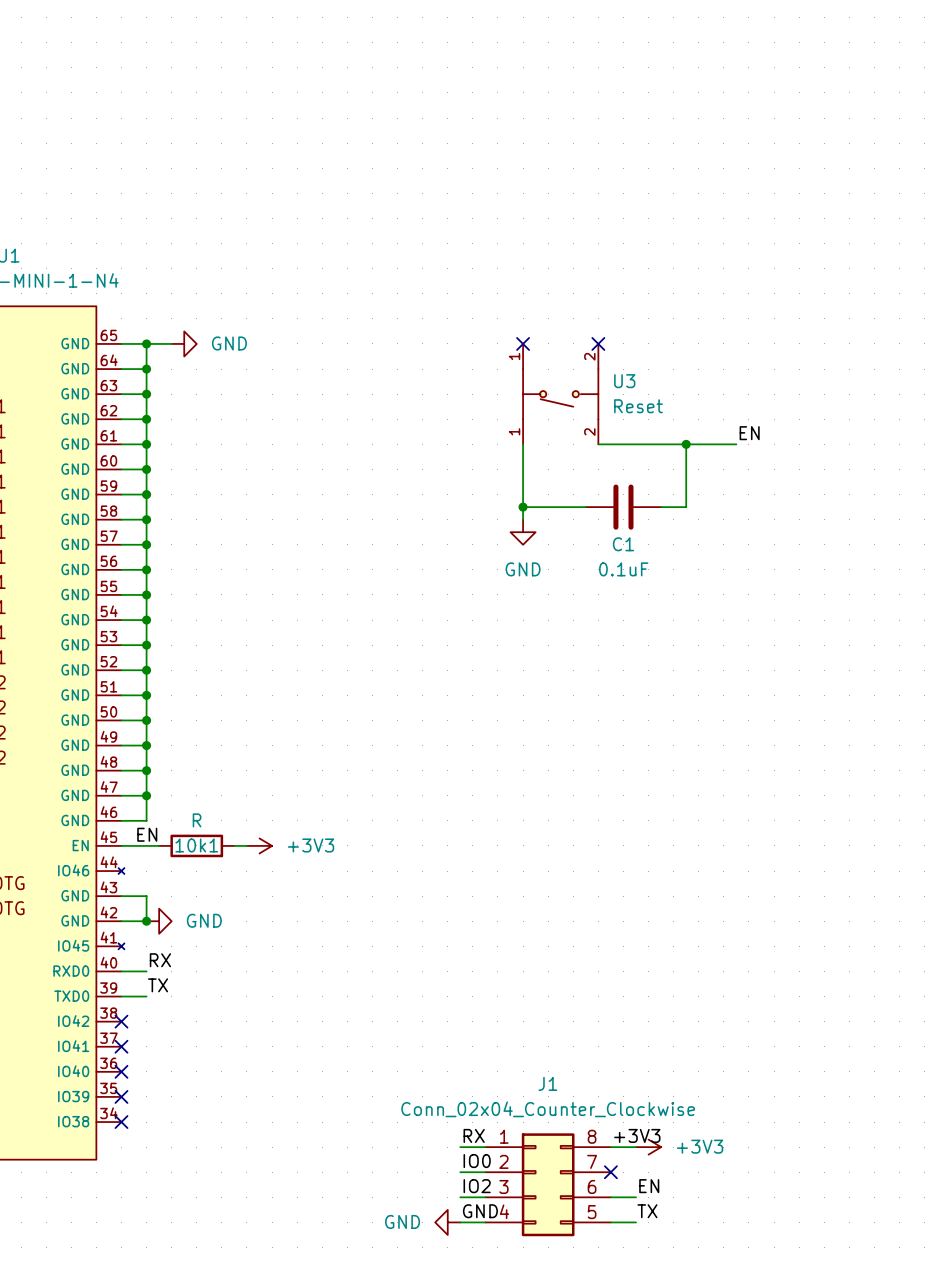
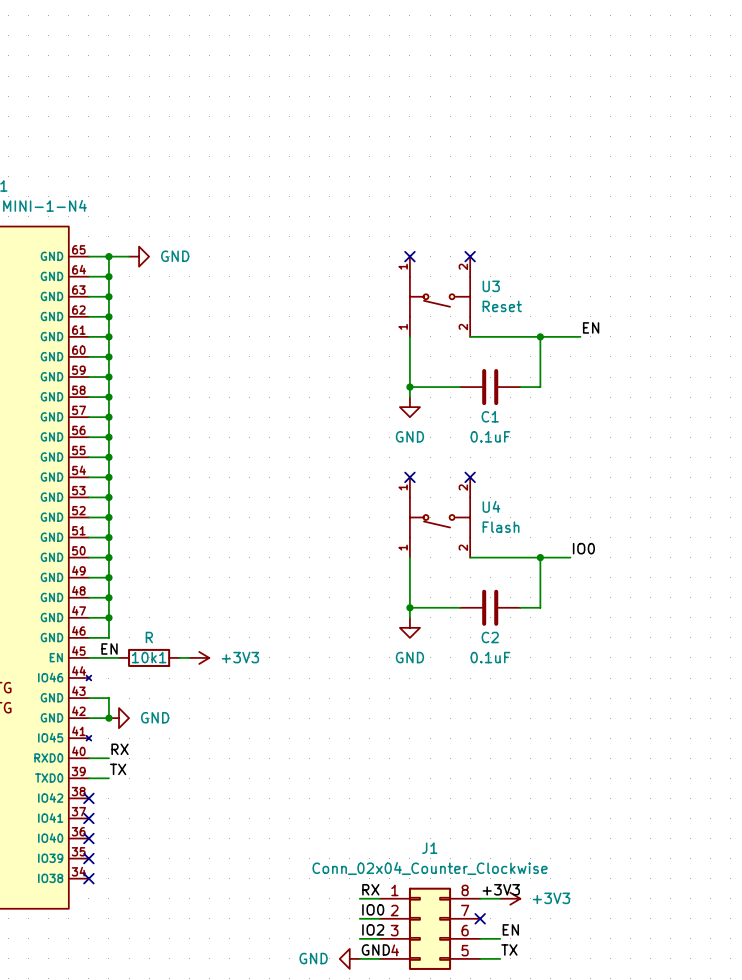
no-connect mark: none -> (409, 477)
no-connect mark: none -> (470, 477)
U4: none -> Flash (440, 517)
label: none -> IO0 (583, 548)
wire: none -> (409, 557) (409, 617)
wire: none -> (470, 557) (570, 557)
wire: none -> (540, 557) (540, 607) (520, 607)
junction: none -> (540, 557)
wire: none -> (409, 607) (460, 607)
junction: none -> (409, 607)
C2: none -> 0.1uF (490, 607)
power symbol: none -> GND (409, 627)

